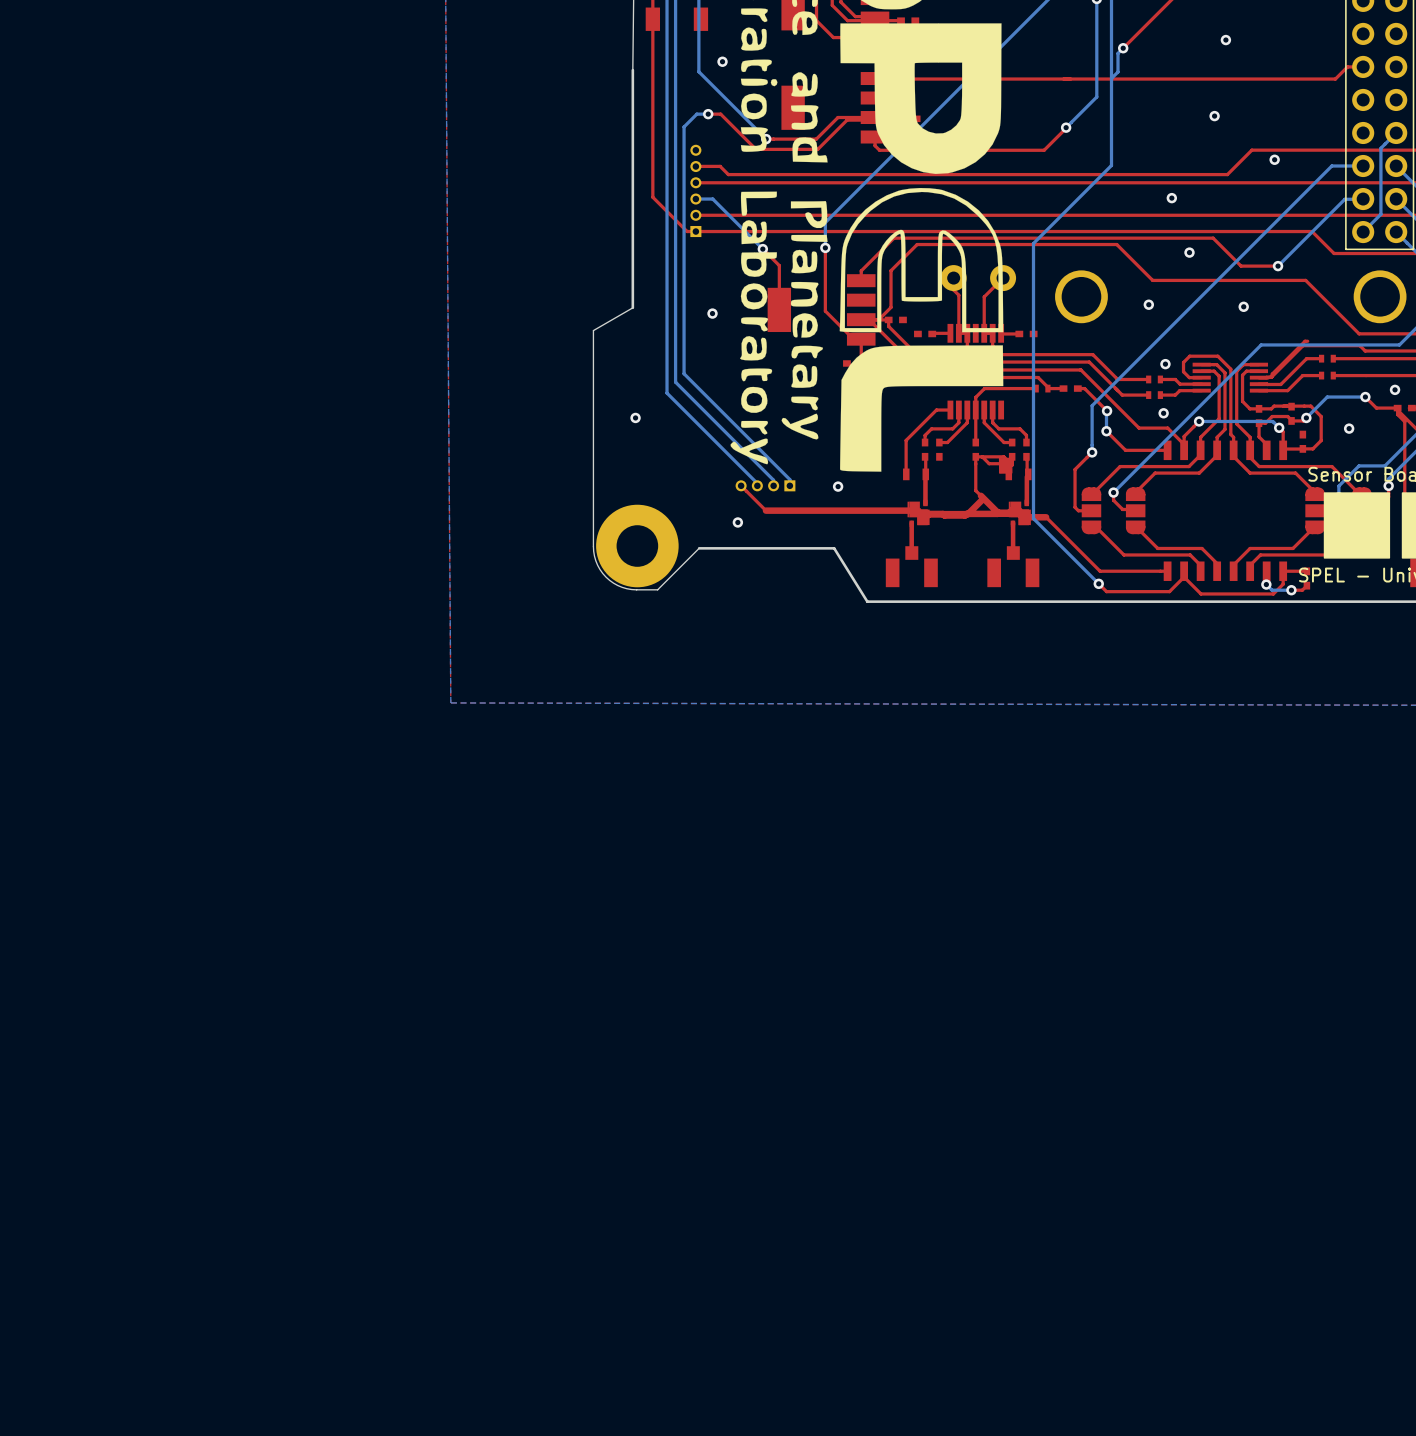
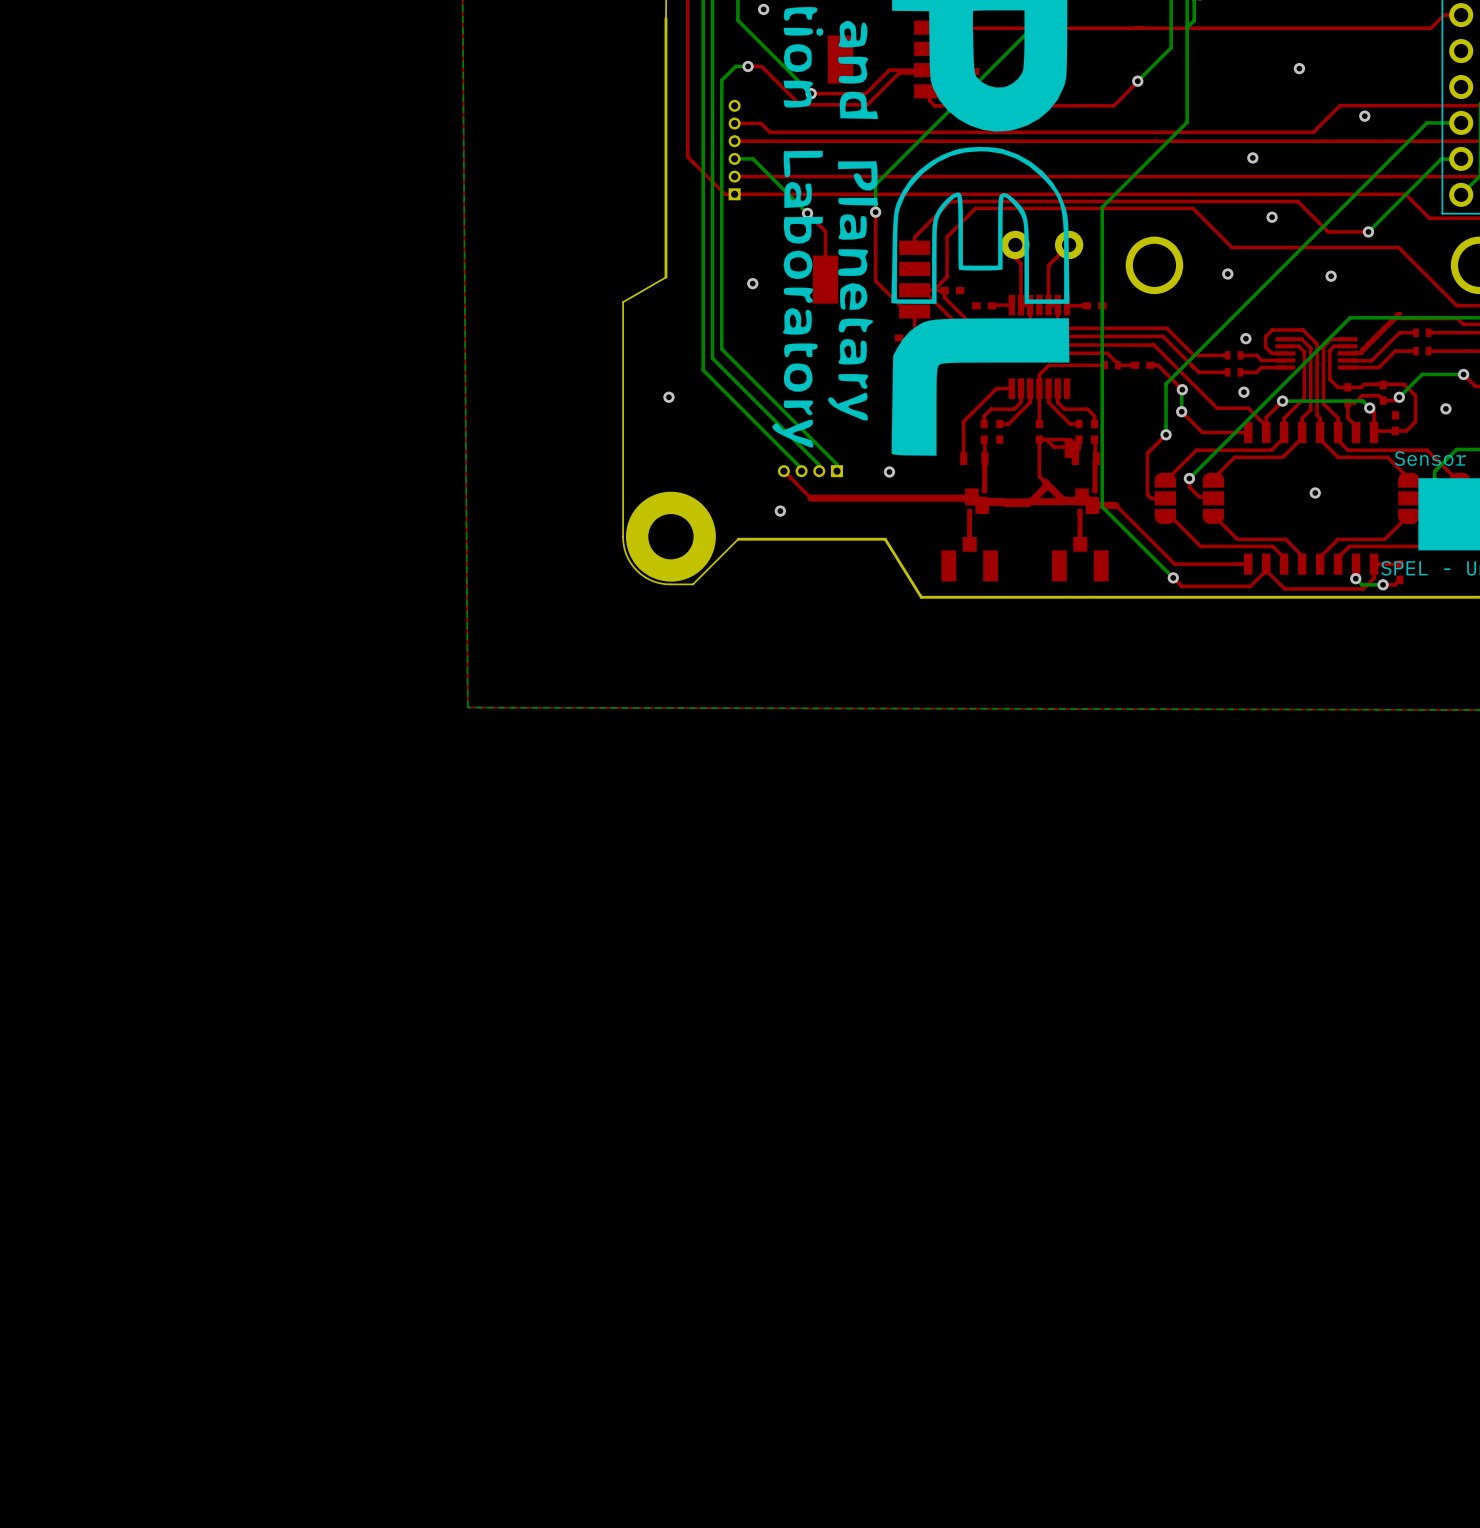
via: none -> (1315, 492)

